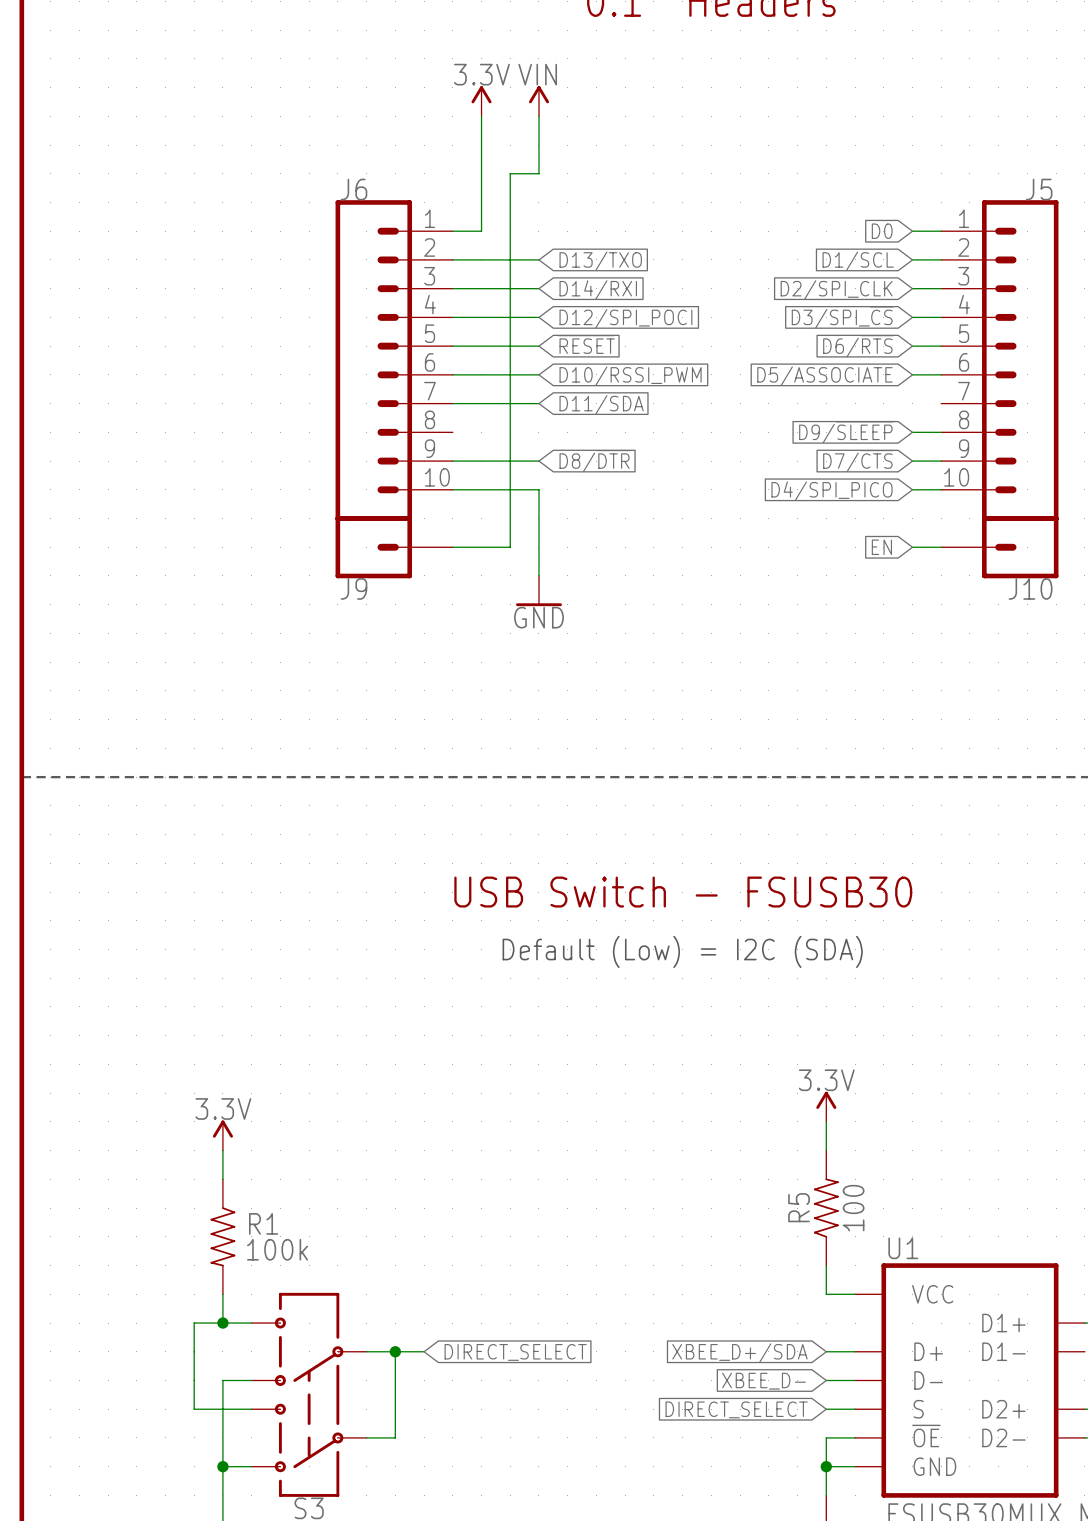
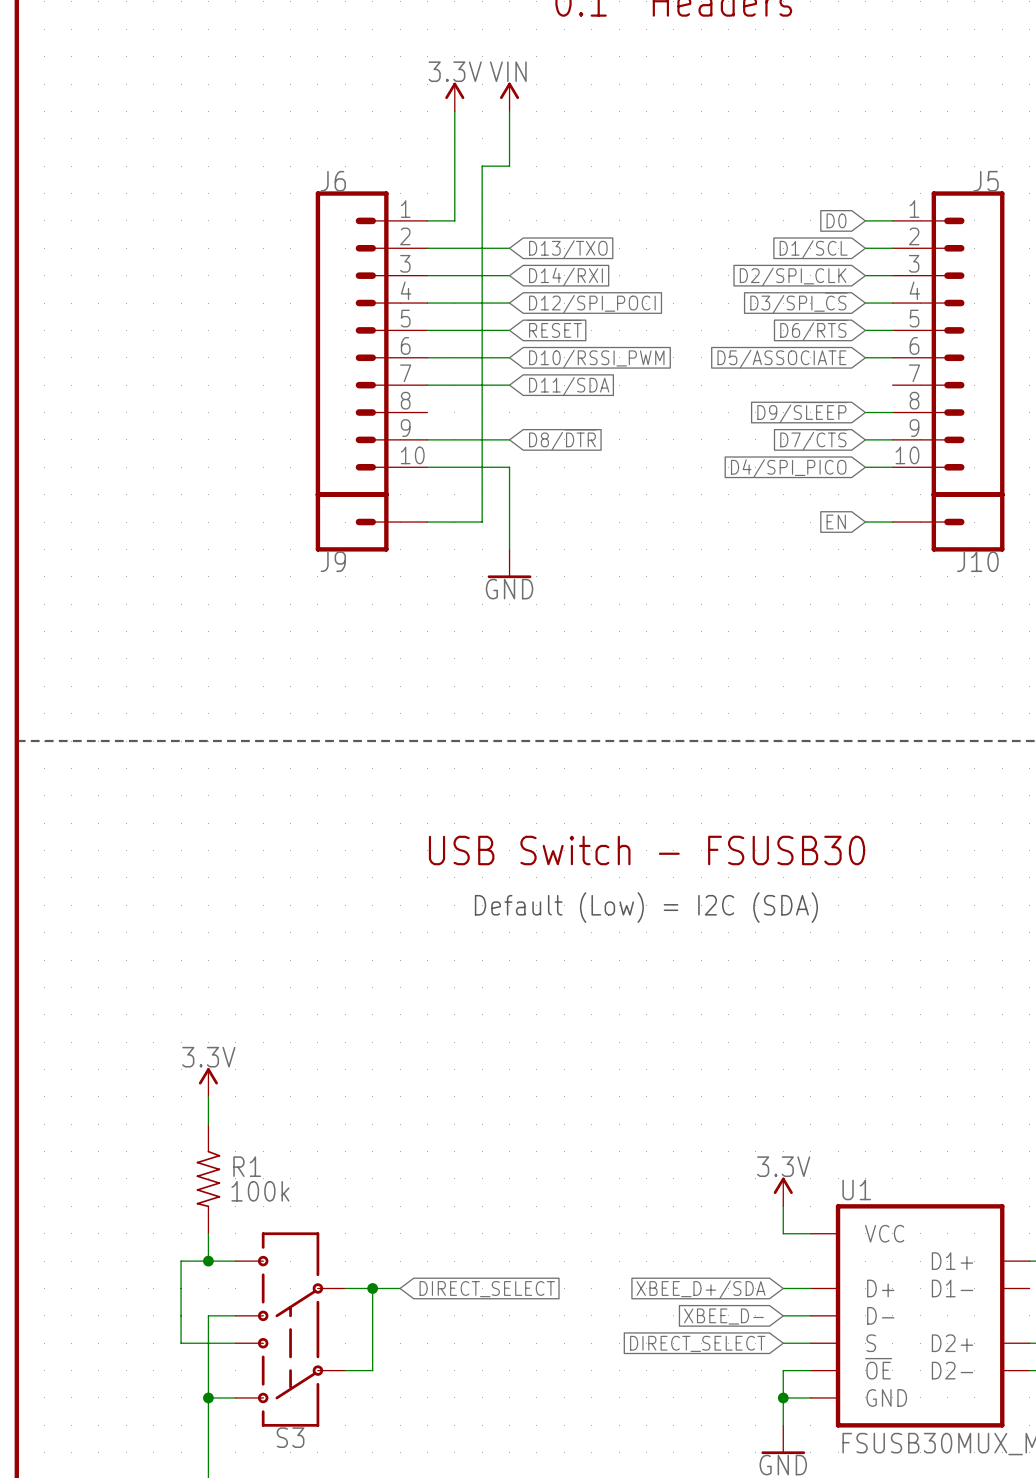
power symbol position: 3.3V (826, 1106) -> 3.3V (783, 1191)
wire: (826, 1121) (826, 1150) -> none
R5: 100 (826, 1208) -> none

